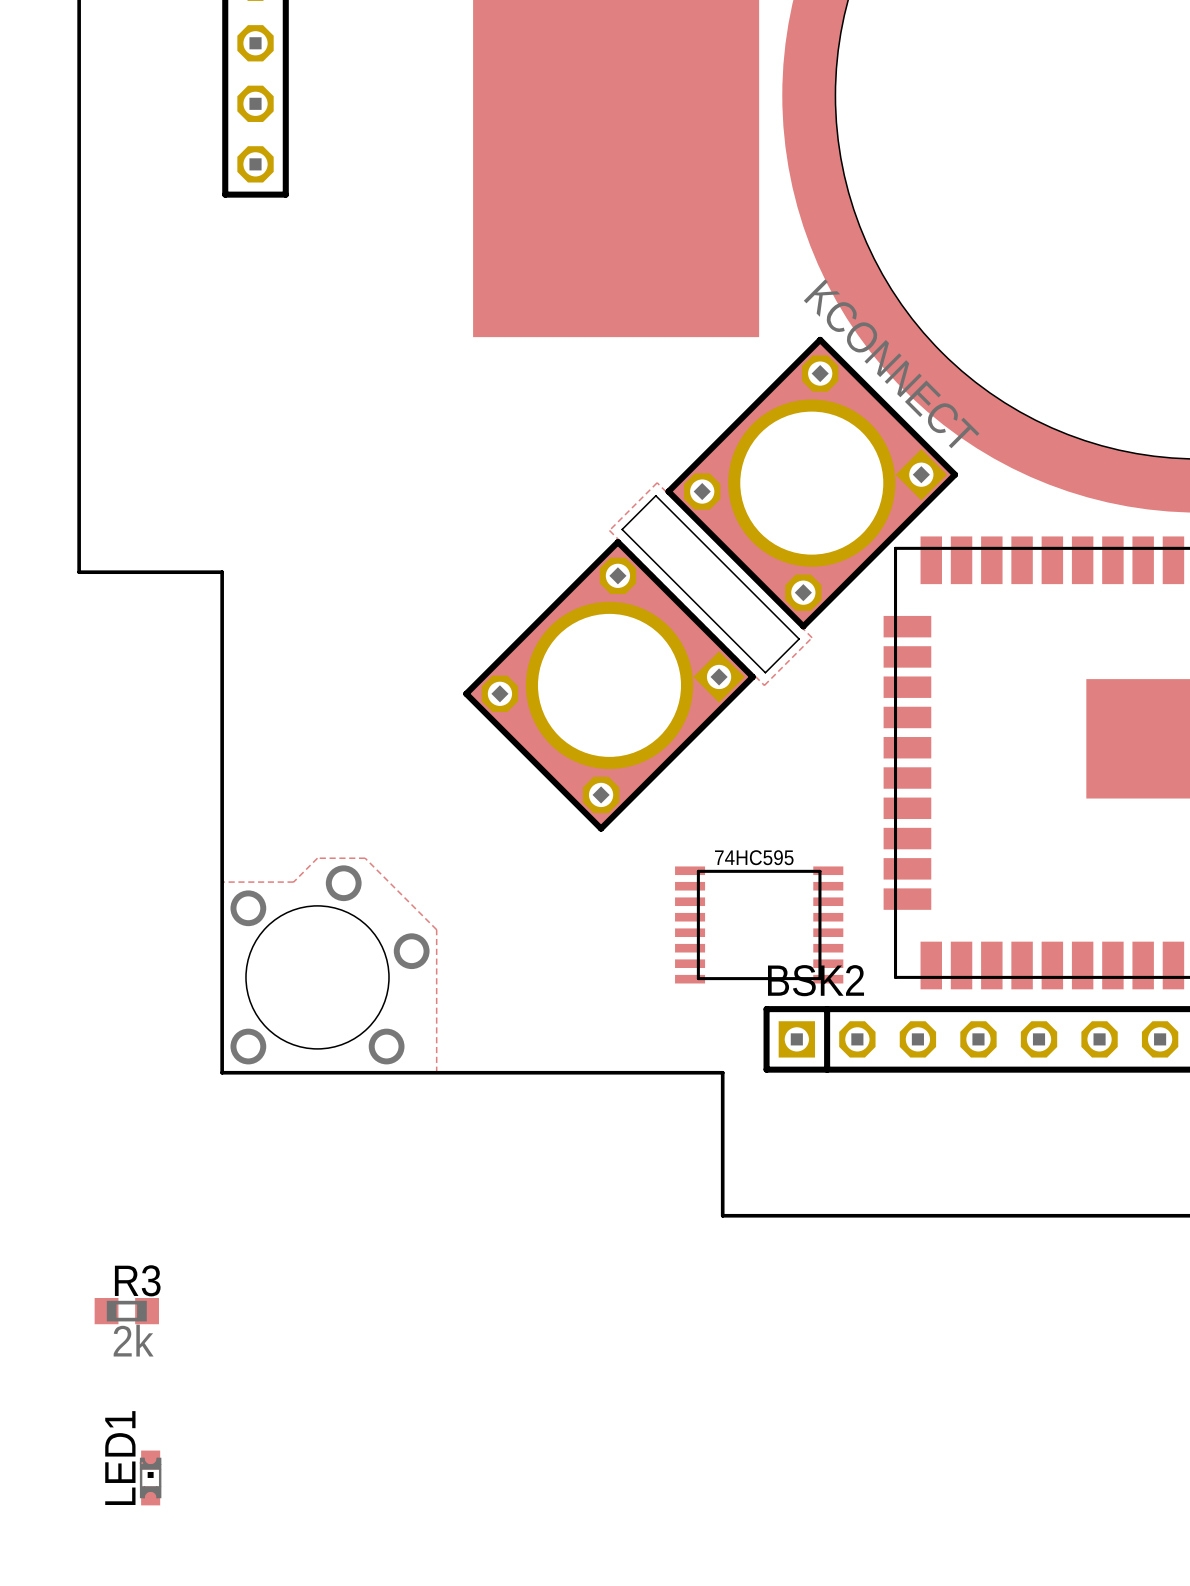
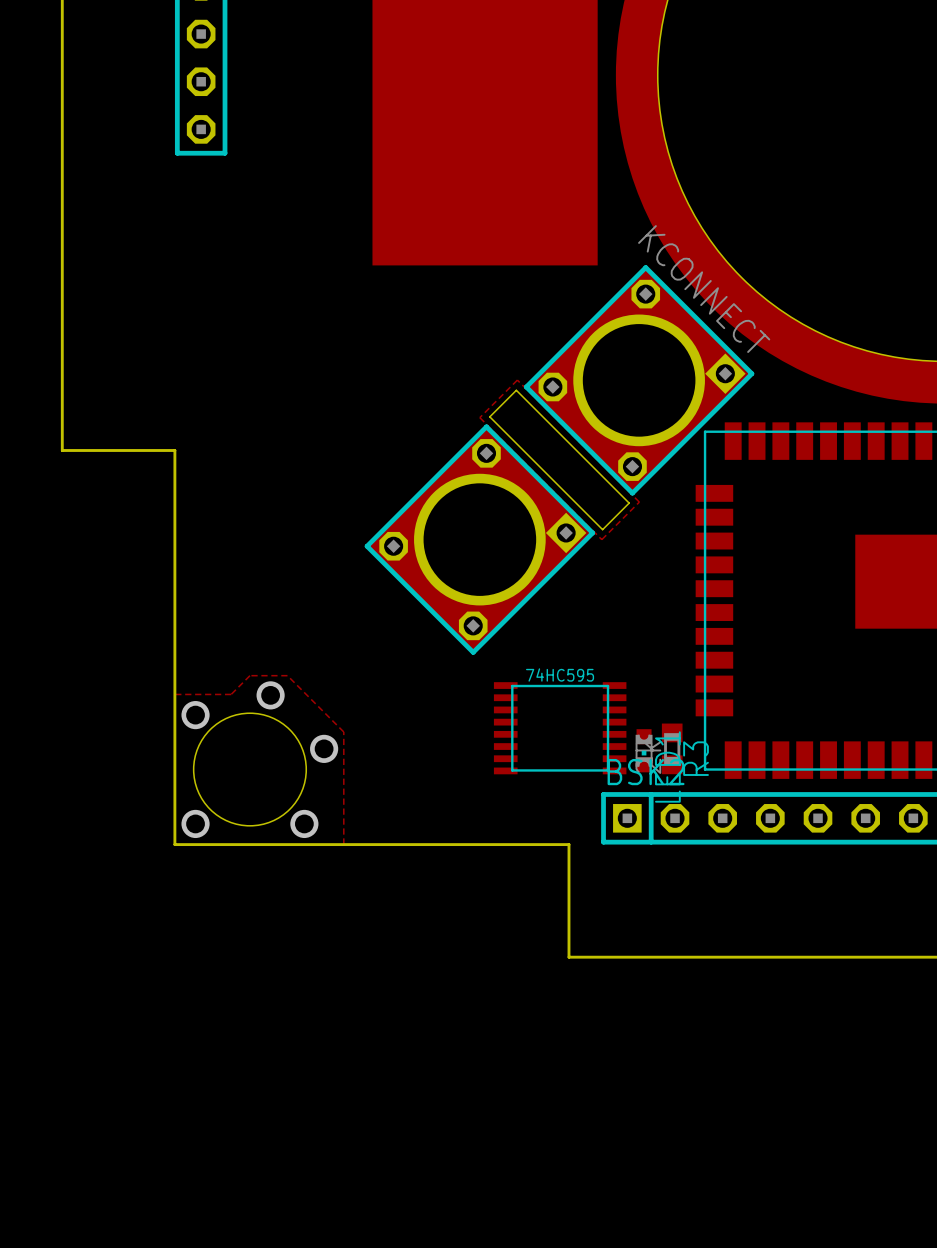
part position: (759, 924) -> (560, 728)
R3 rotation: 0° (126, 1311) -> 90° clockwise (672, 748)
R3 position: (126, 1311) -> (672, 748)
LED1 rotation: 0° (150, 1477) -> 180° (644, 750)
LED1 position: (150, 1477) -> (644, 750)

